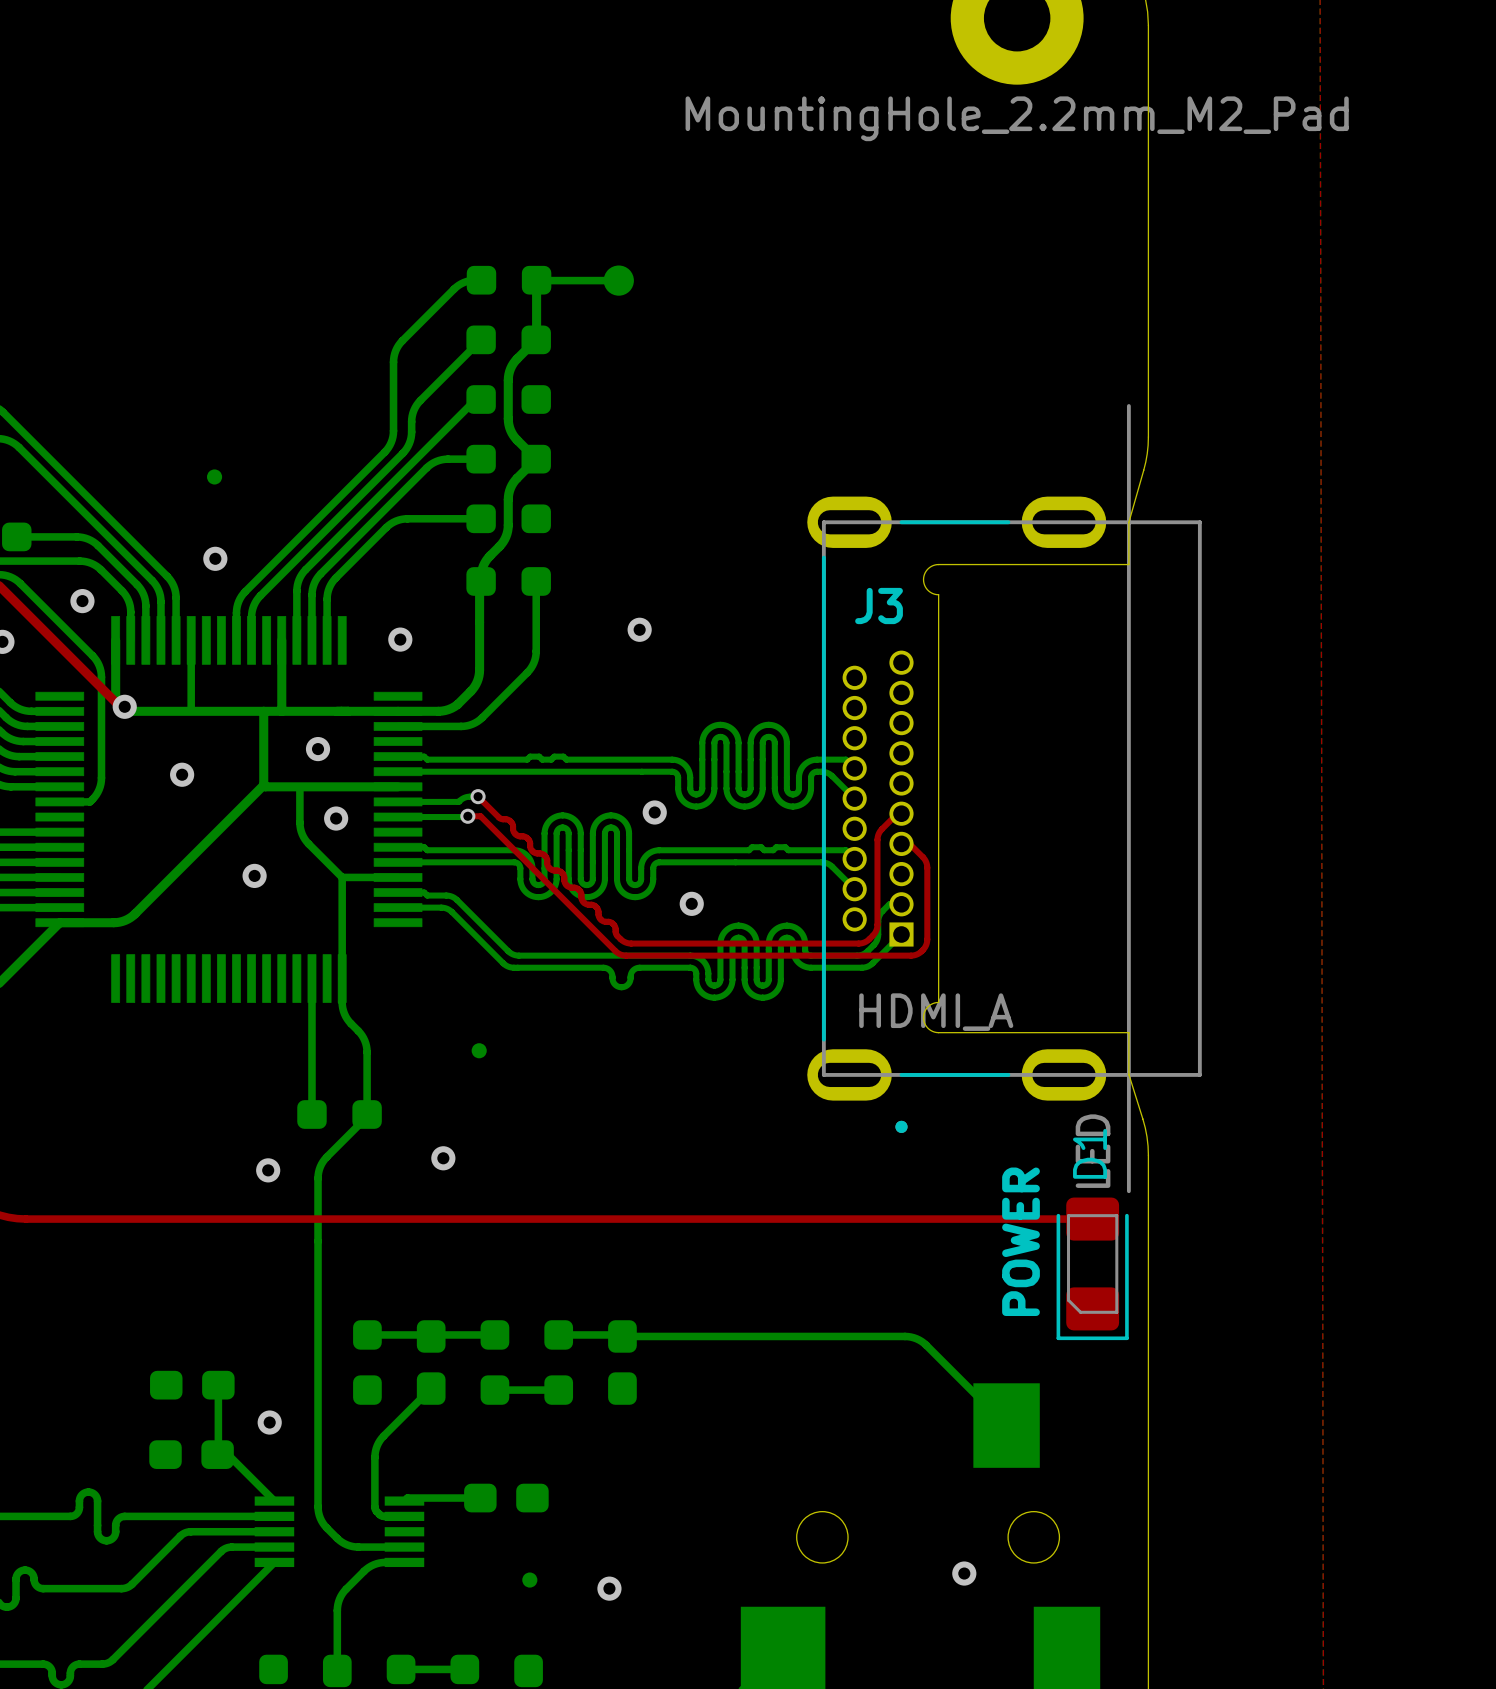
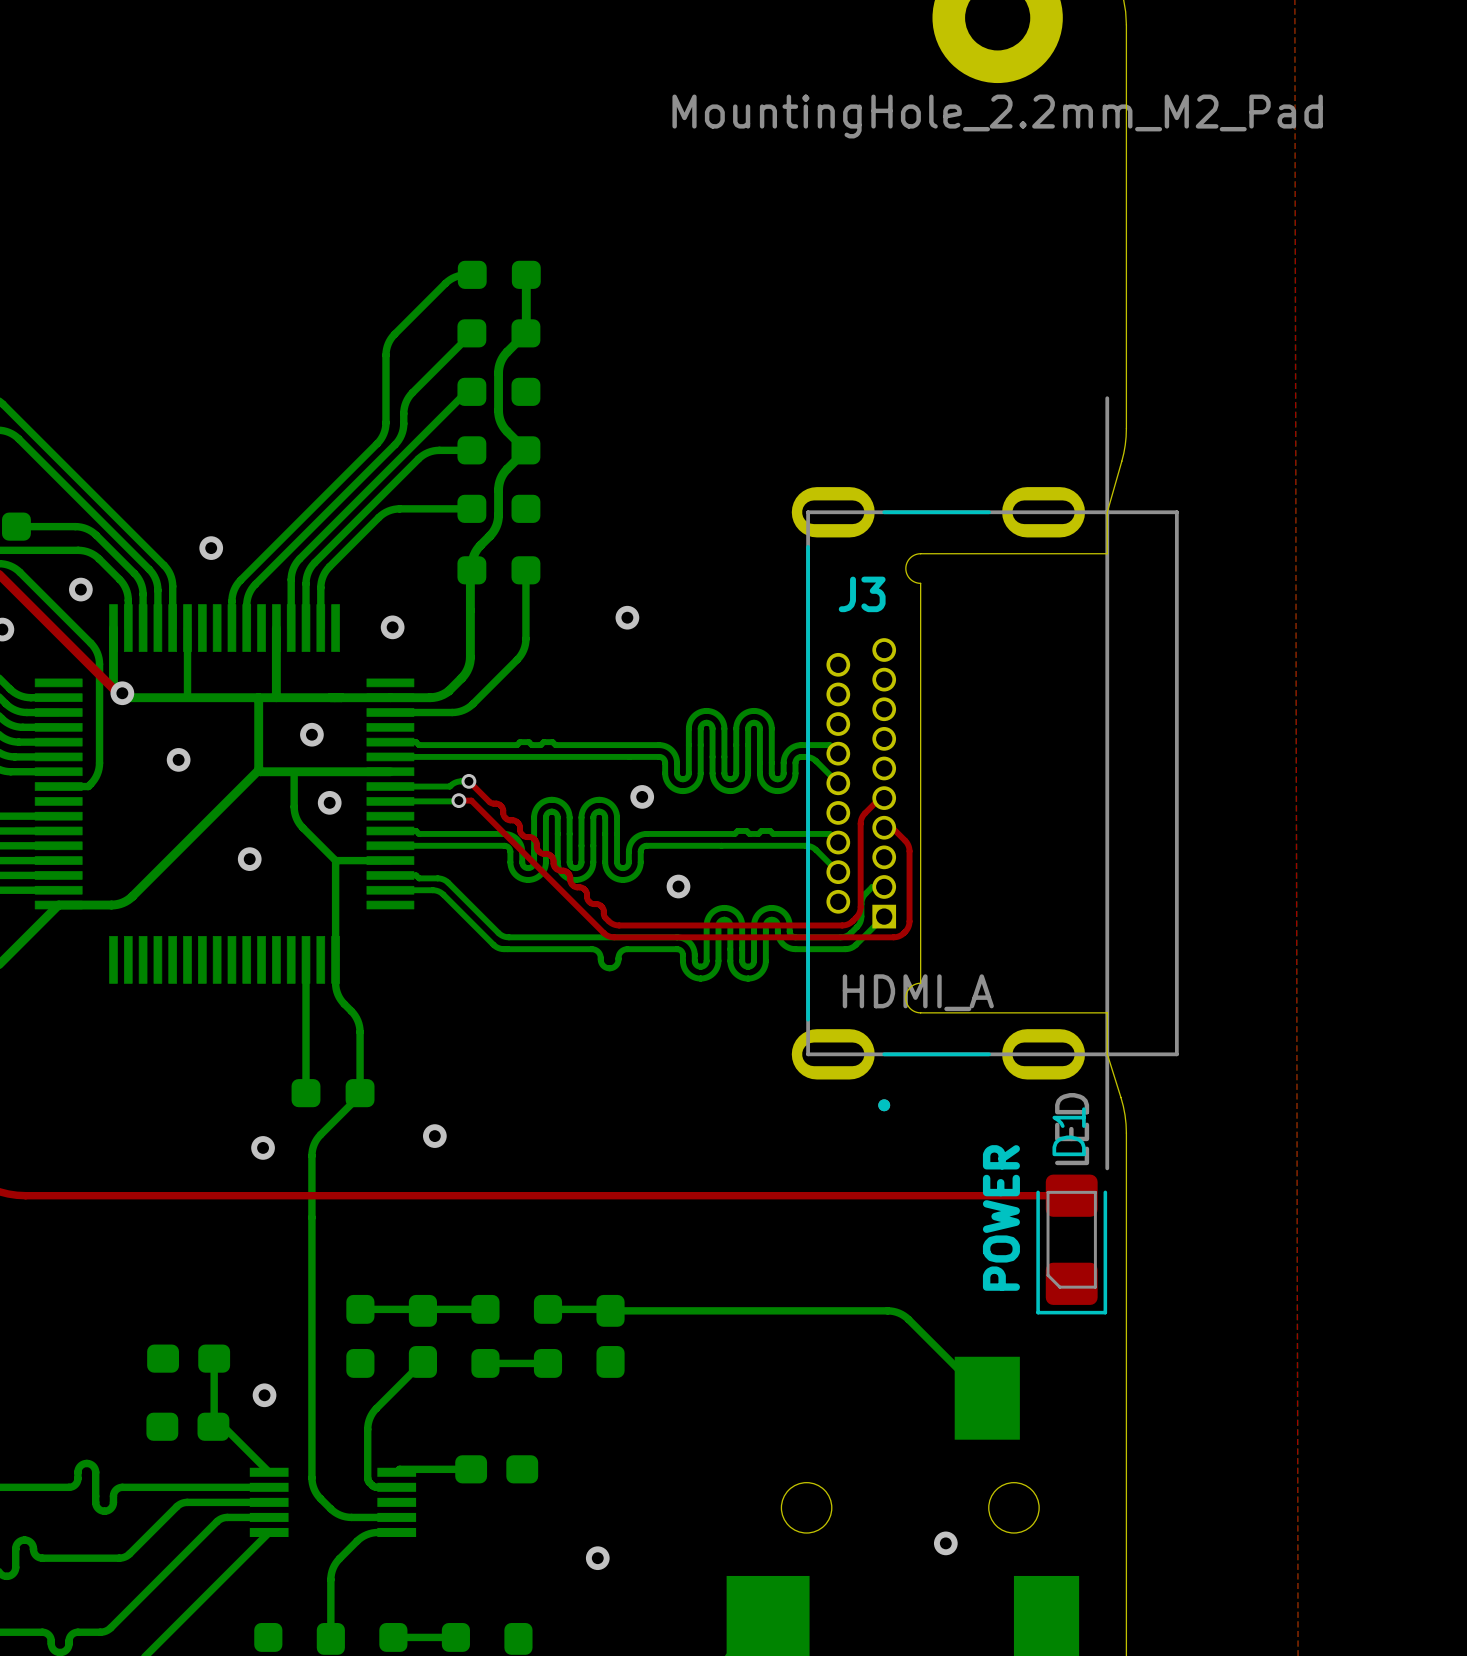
bottom track: (536, 280) (618, 280) -> none
part: (618, 280) -> none
part: (214, 476) -> none
part: (479, 1050) -> none
part: (529, 1580) -> none

